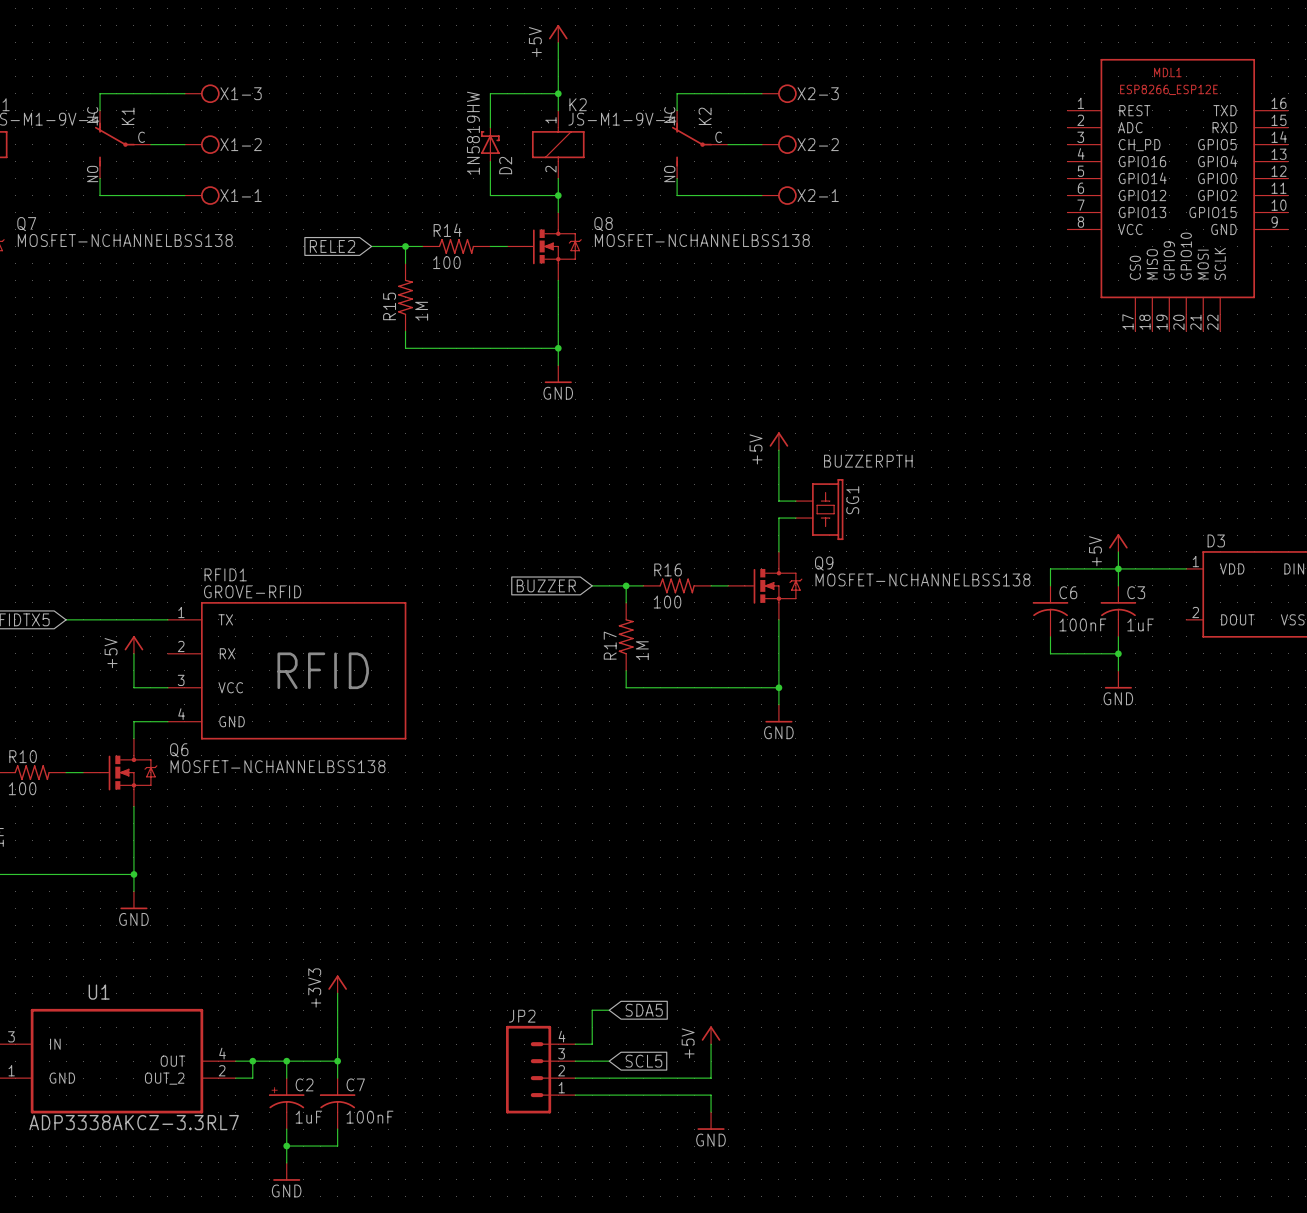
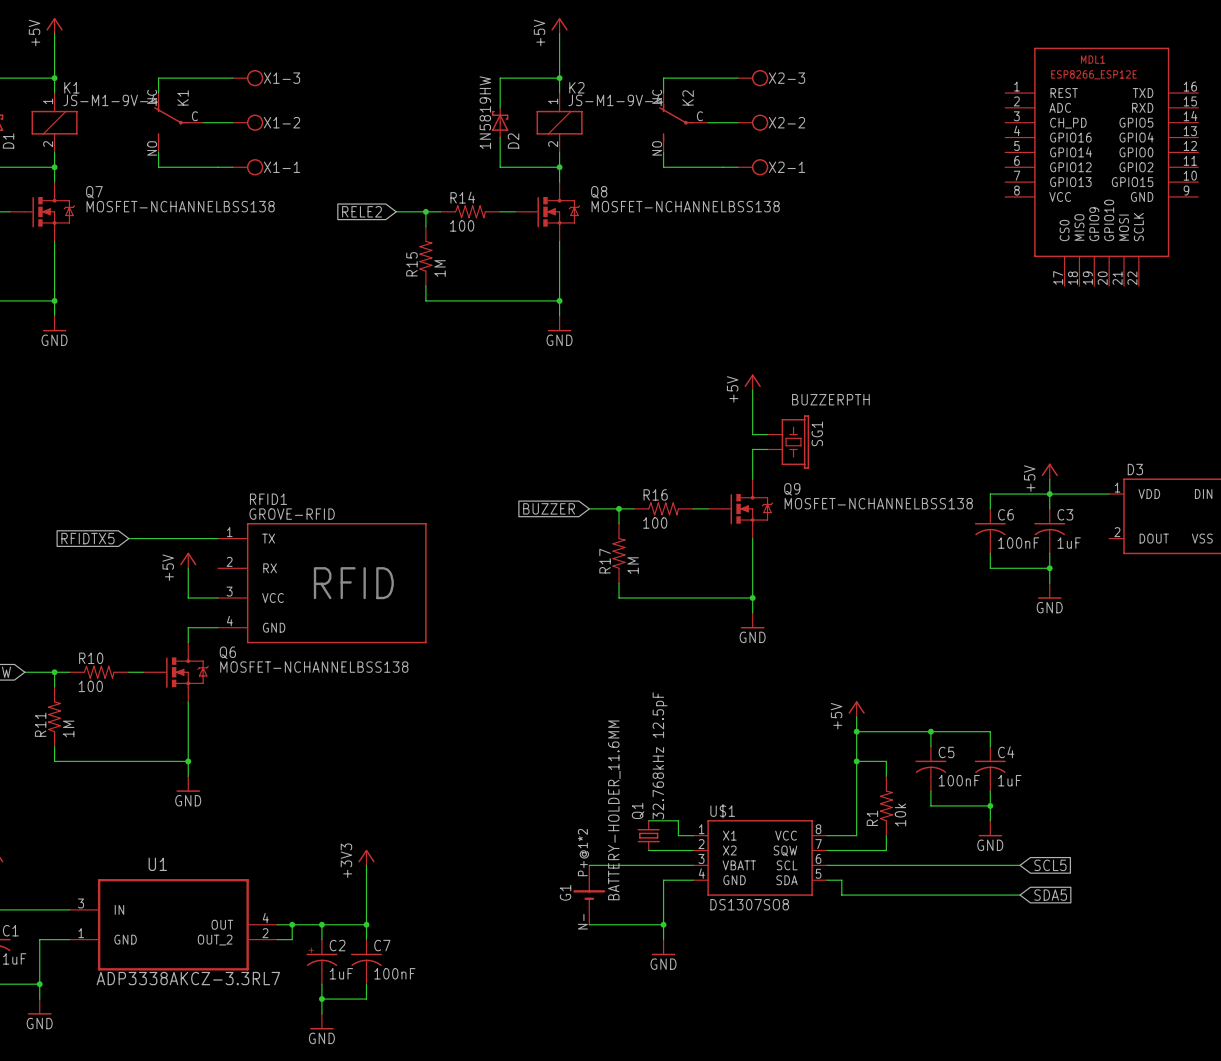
power symbol: none -> +5V (856, 709)
wire: none -> (856, 716) (856, 835) (826, 835)
wire: none -> (856, 731) (990, 731) (990, 746)
junction: none -> (856, 731)
wire: none -> (930, 731) (930, 746)
junction: none -> (930, 731)
wire: none -> (856, 761) (886, 761) (886, 776)
junction: none -> (856, 761)
C5: none -> 100nF (930, 768)
C4: none -> 1uF (990, 768)
wire: none -> (930, 791) (930, 805) (990, 805)
wire: none -> (990, 791) (990, 820)
R1: none -> 10k (886, 805)
junction: none -> (990, 805)
wire: none -> (648, 820) (678, 820) (678, 835) (693, 835)
power symbol: none -> GND (990, 828)
Q1: none -> 32.768kHz 12.5pF (648, 835)
wire: none -> (886, 835) (886, 850) (826, 850)
wire: none -> (648, 850) (693, 850)
U$1: none -> DS1307SO8 (760, 857)
wire: none -> (589, 865) (693, 865)
wire: none -> (826, 865) (1020, 865)
global label: none -> SCL5 (1050, 865)
wire: (609, 1010) (592, 1010) (592, 1044) (575, 1044) -> none
global label: SDA5 (644, 1010) -> none
wire: none -> (693, 880) (663, 880) (663, 939)
wire: none -> (826, 880) (841, 880) (841, 895) (1020, 895)
G1: none -> BATTERY-HOLDER_11.6MM (589, 895)
global label: none -> SDA5 (1050, 895)
power symbol: +5V (711, 1035) -> none
wire: (711, 1044) (711, 1078) (575, 1078) -> none
wire: none -> (604, 924) (663, 924)
global label: SCL5 (643, 1061) -> none
junction: none -> (663, 924)
JP2: (540, 1069) -> none
wire: (575, 1095) (711, 1095) (711, 1112) -> none
power symbol position: GND (711, 1120) -> GND (663, 947)

